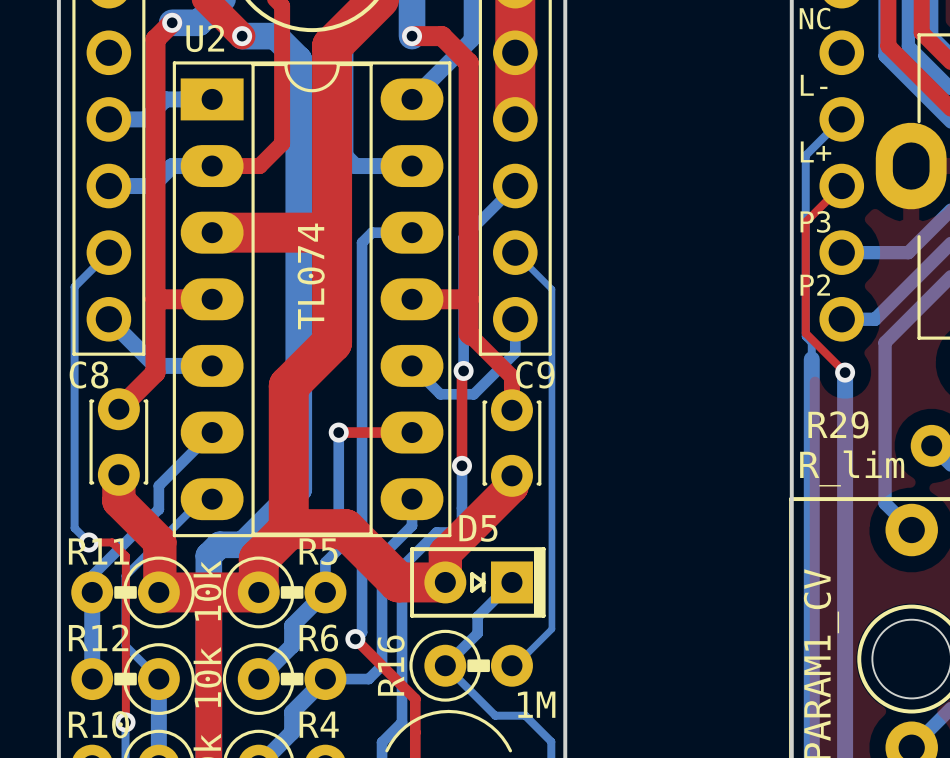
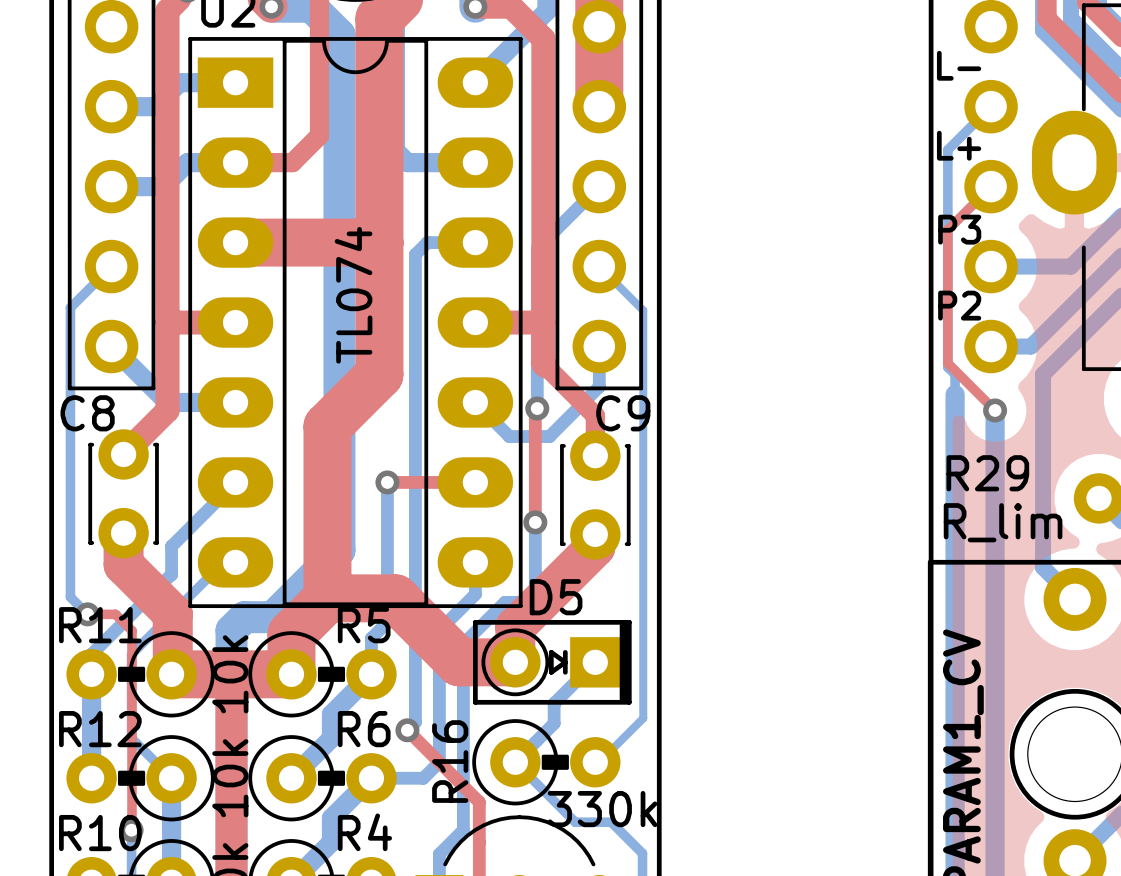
D5 footprint: [410, 547, 546, 618] -> [473, 619, 632, 705]
R16 value: 1M (536, 704) -> 330k (602, 809)

